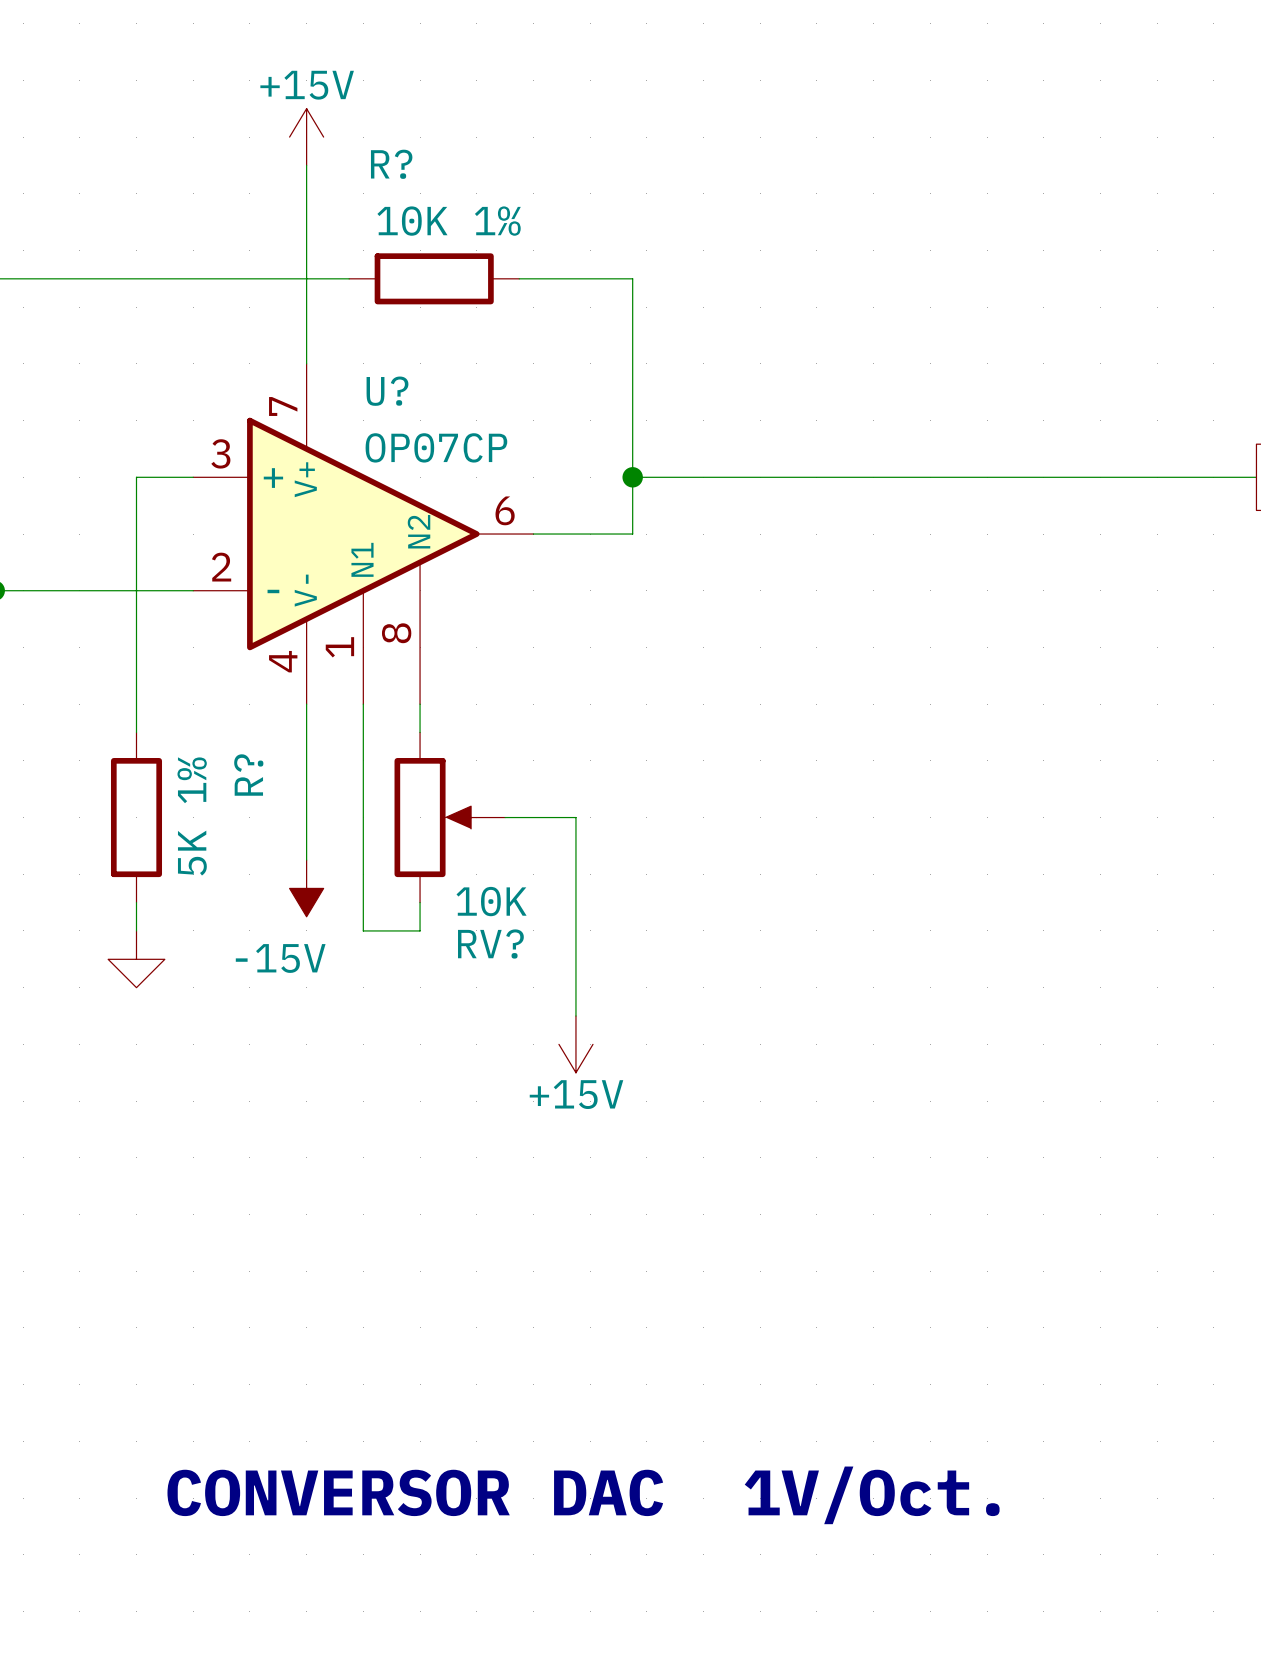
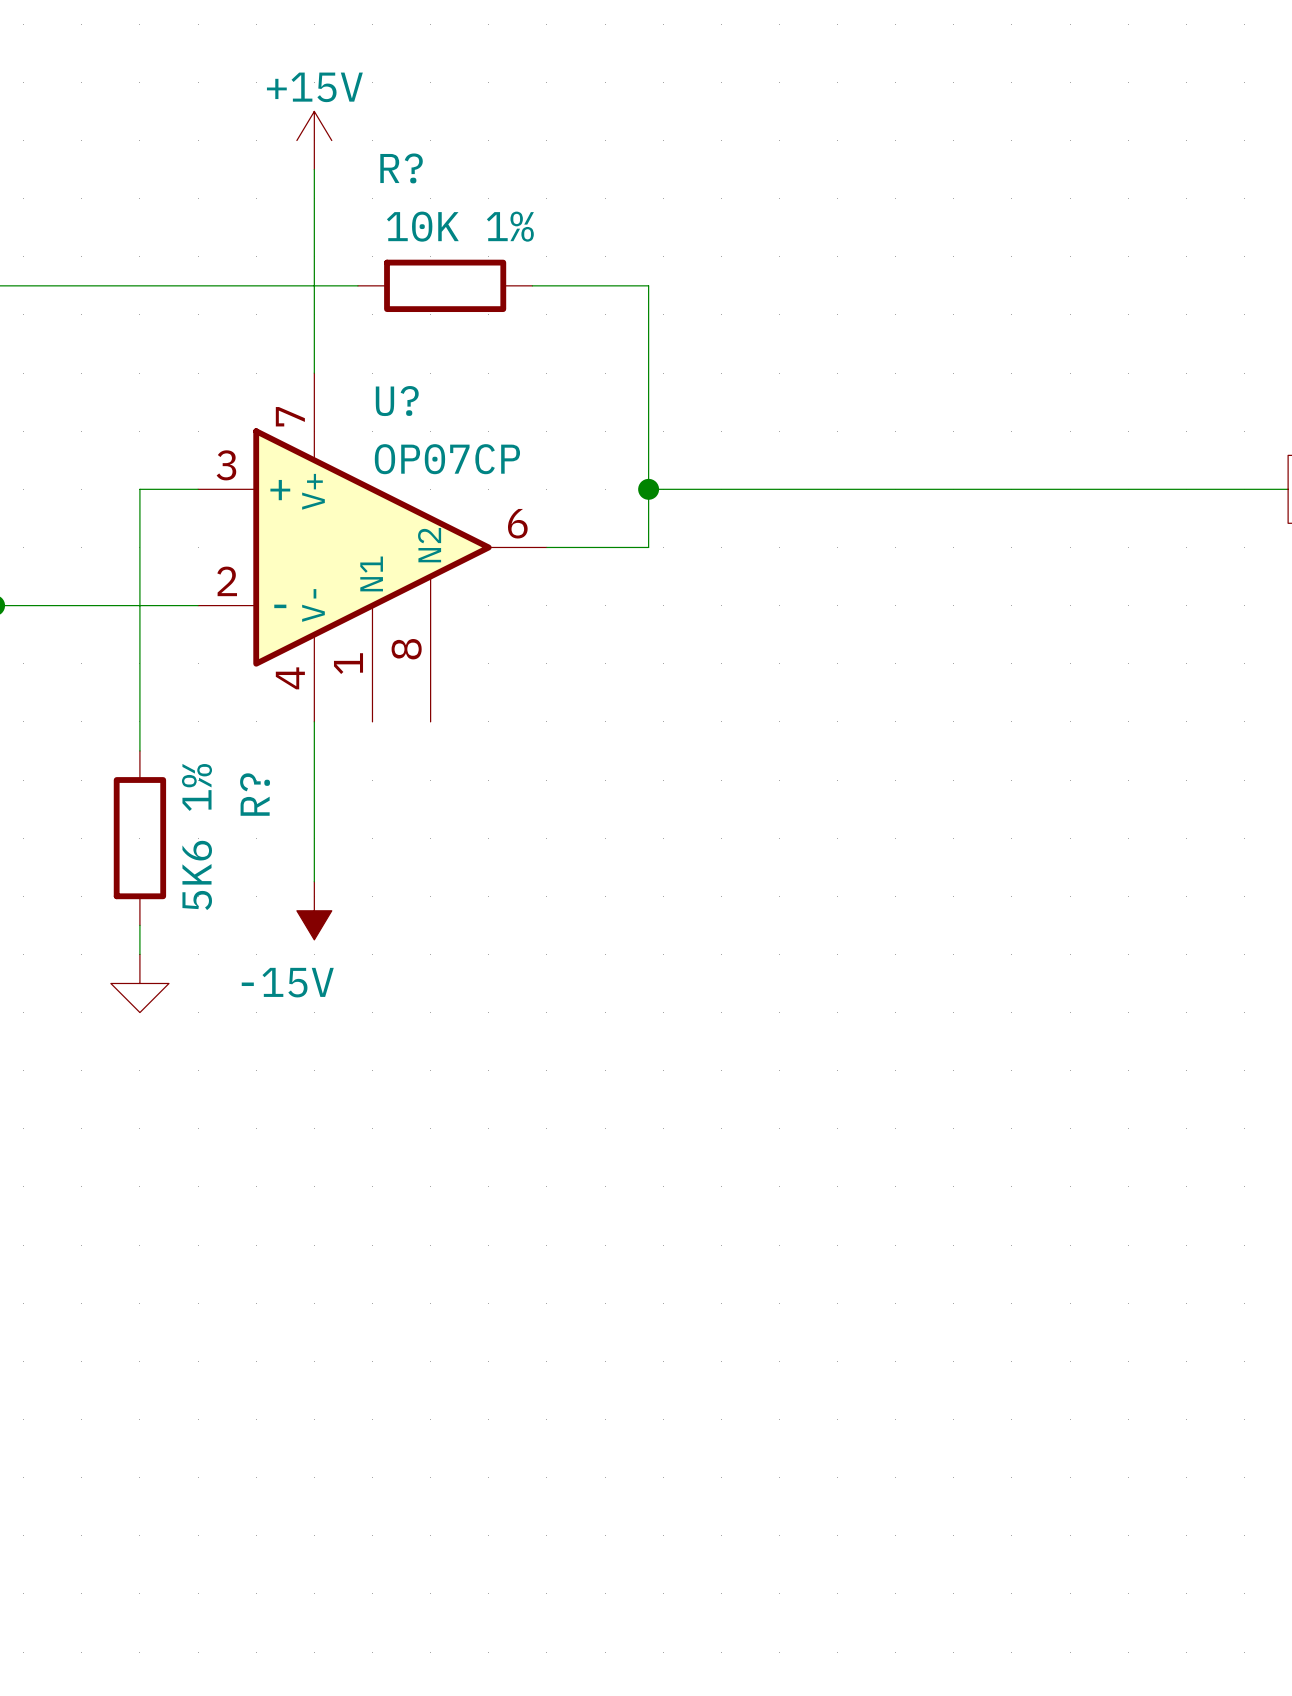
wire: (363, 704) (363, 930) (420, 930) (420, 902) -> none
wire: (420, 704) (420, 732) -> none
R? value: 5K 1% (192, 816) -> 5K6 1% (196, 837)
RV?: 10K (449, 817) -> none
wire: (505, 817) (575, 817) (575, 1016) -> none
power symbol: +15V (575, 1044) -> none
text: CONVERSOR DAC 1V/Oct. (583, 1495) -> none

